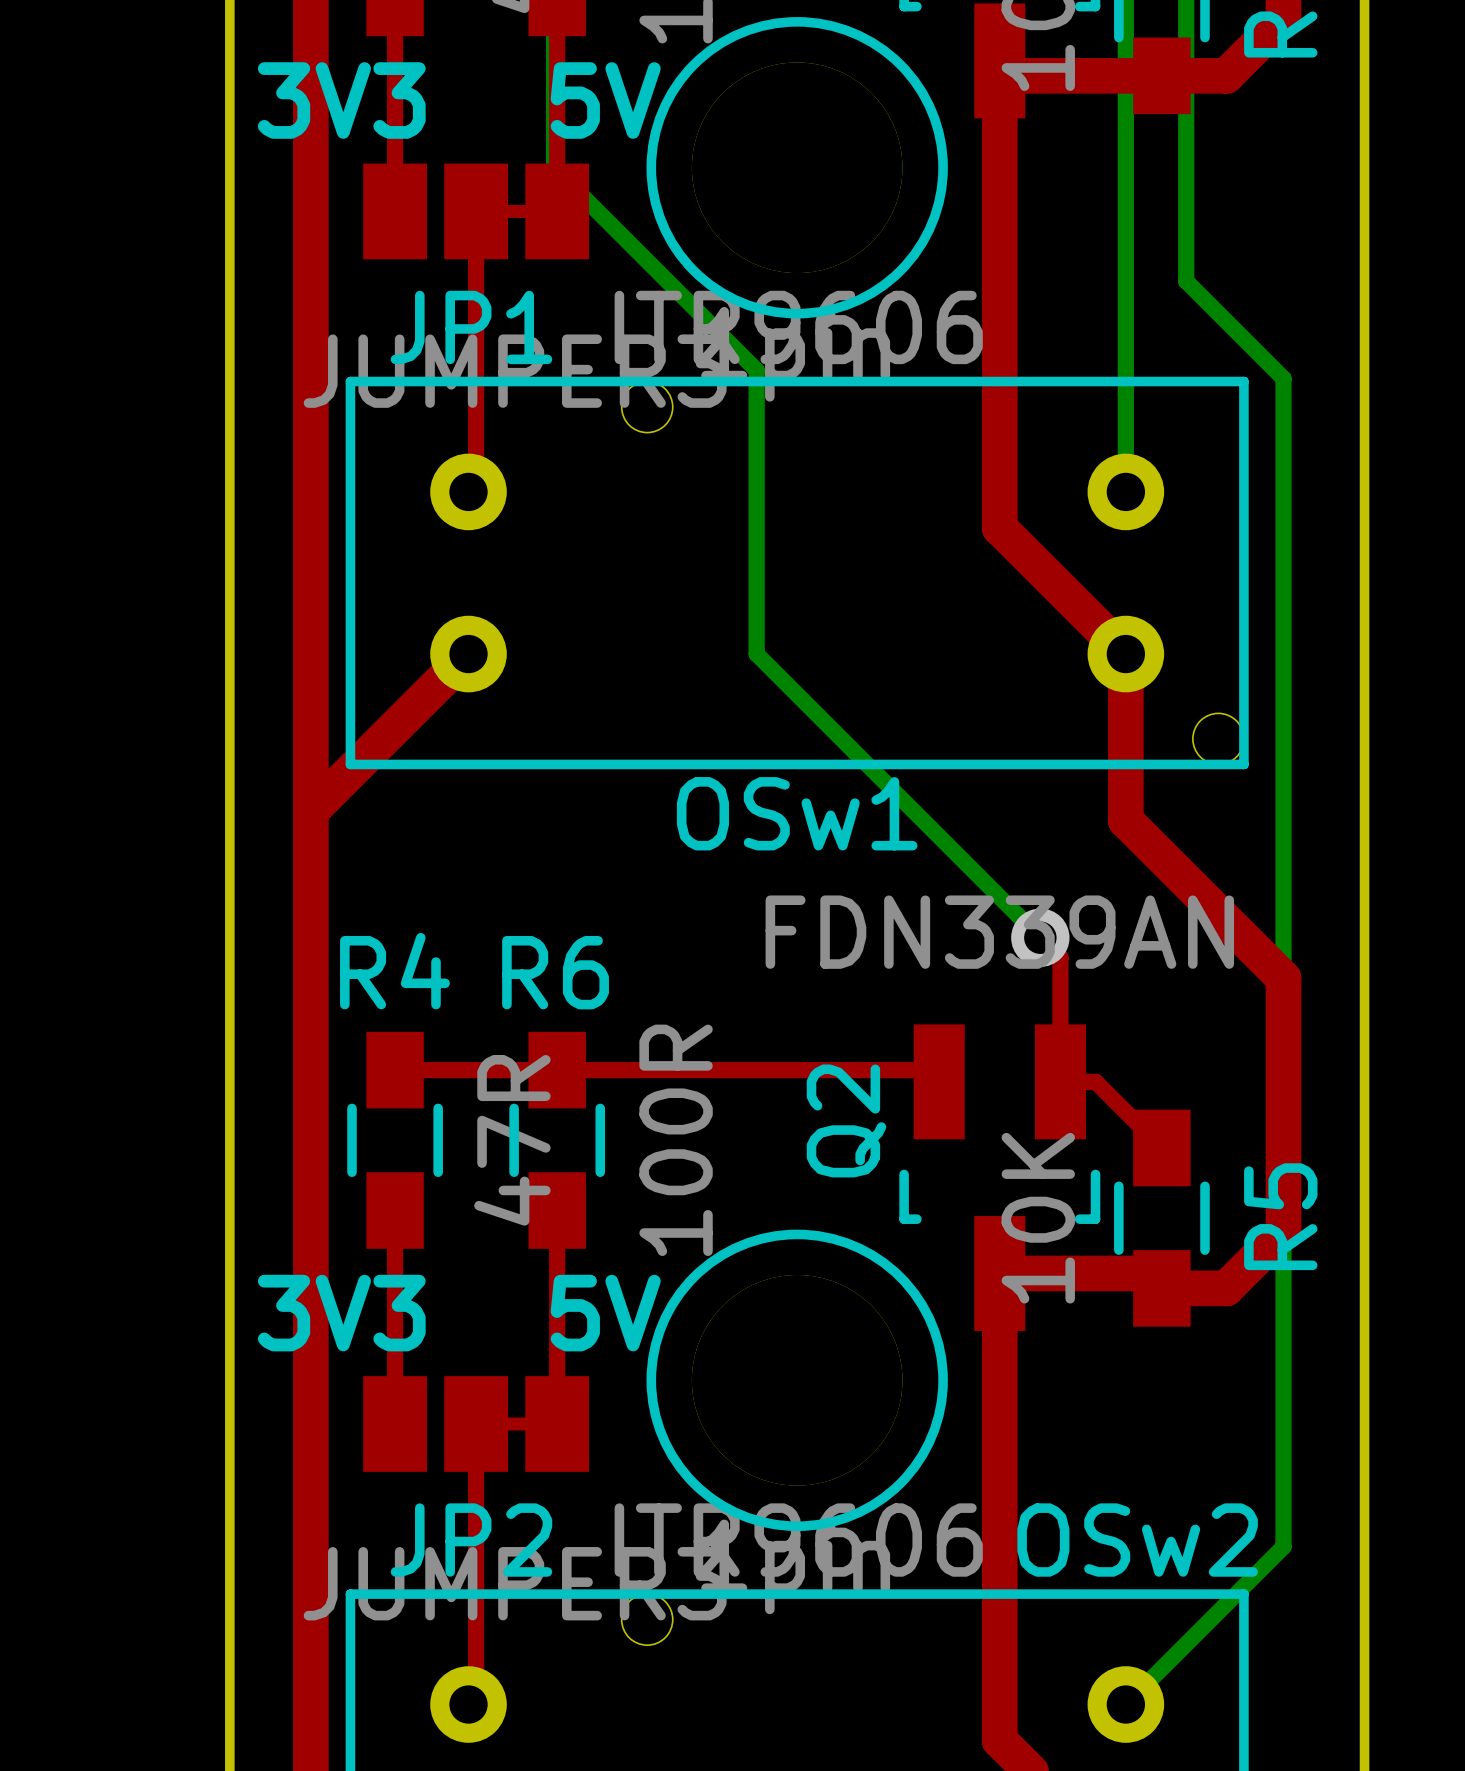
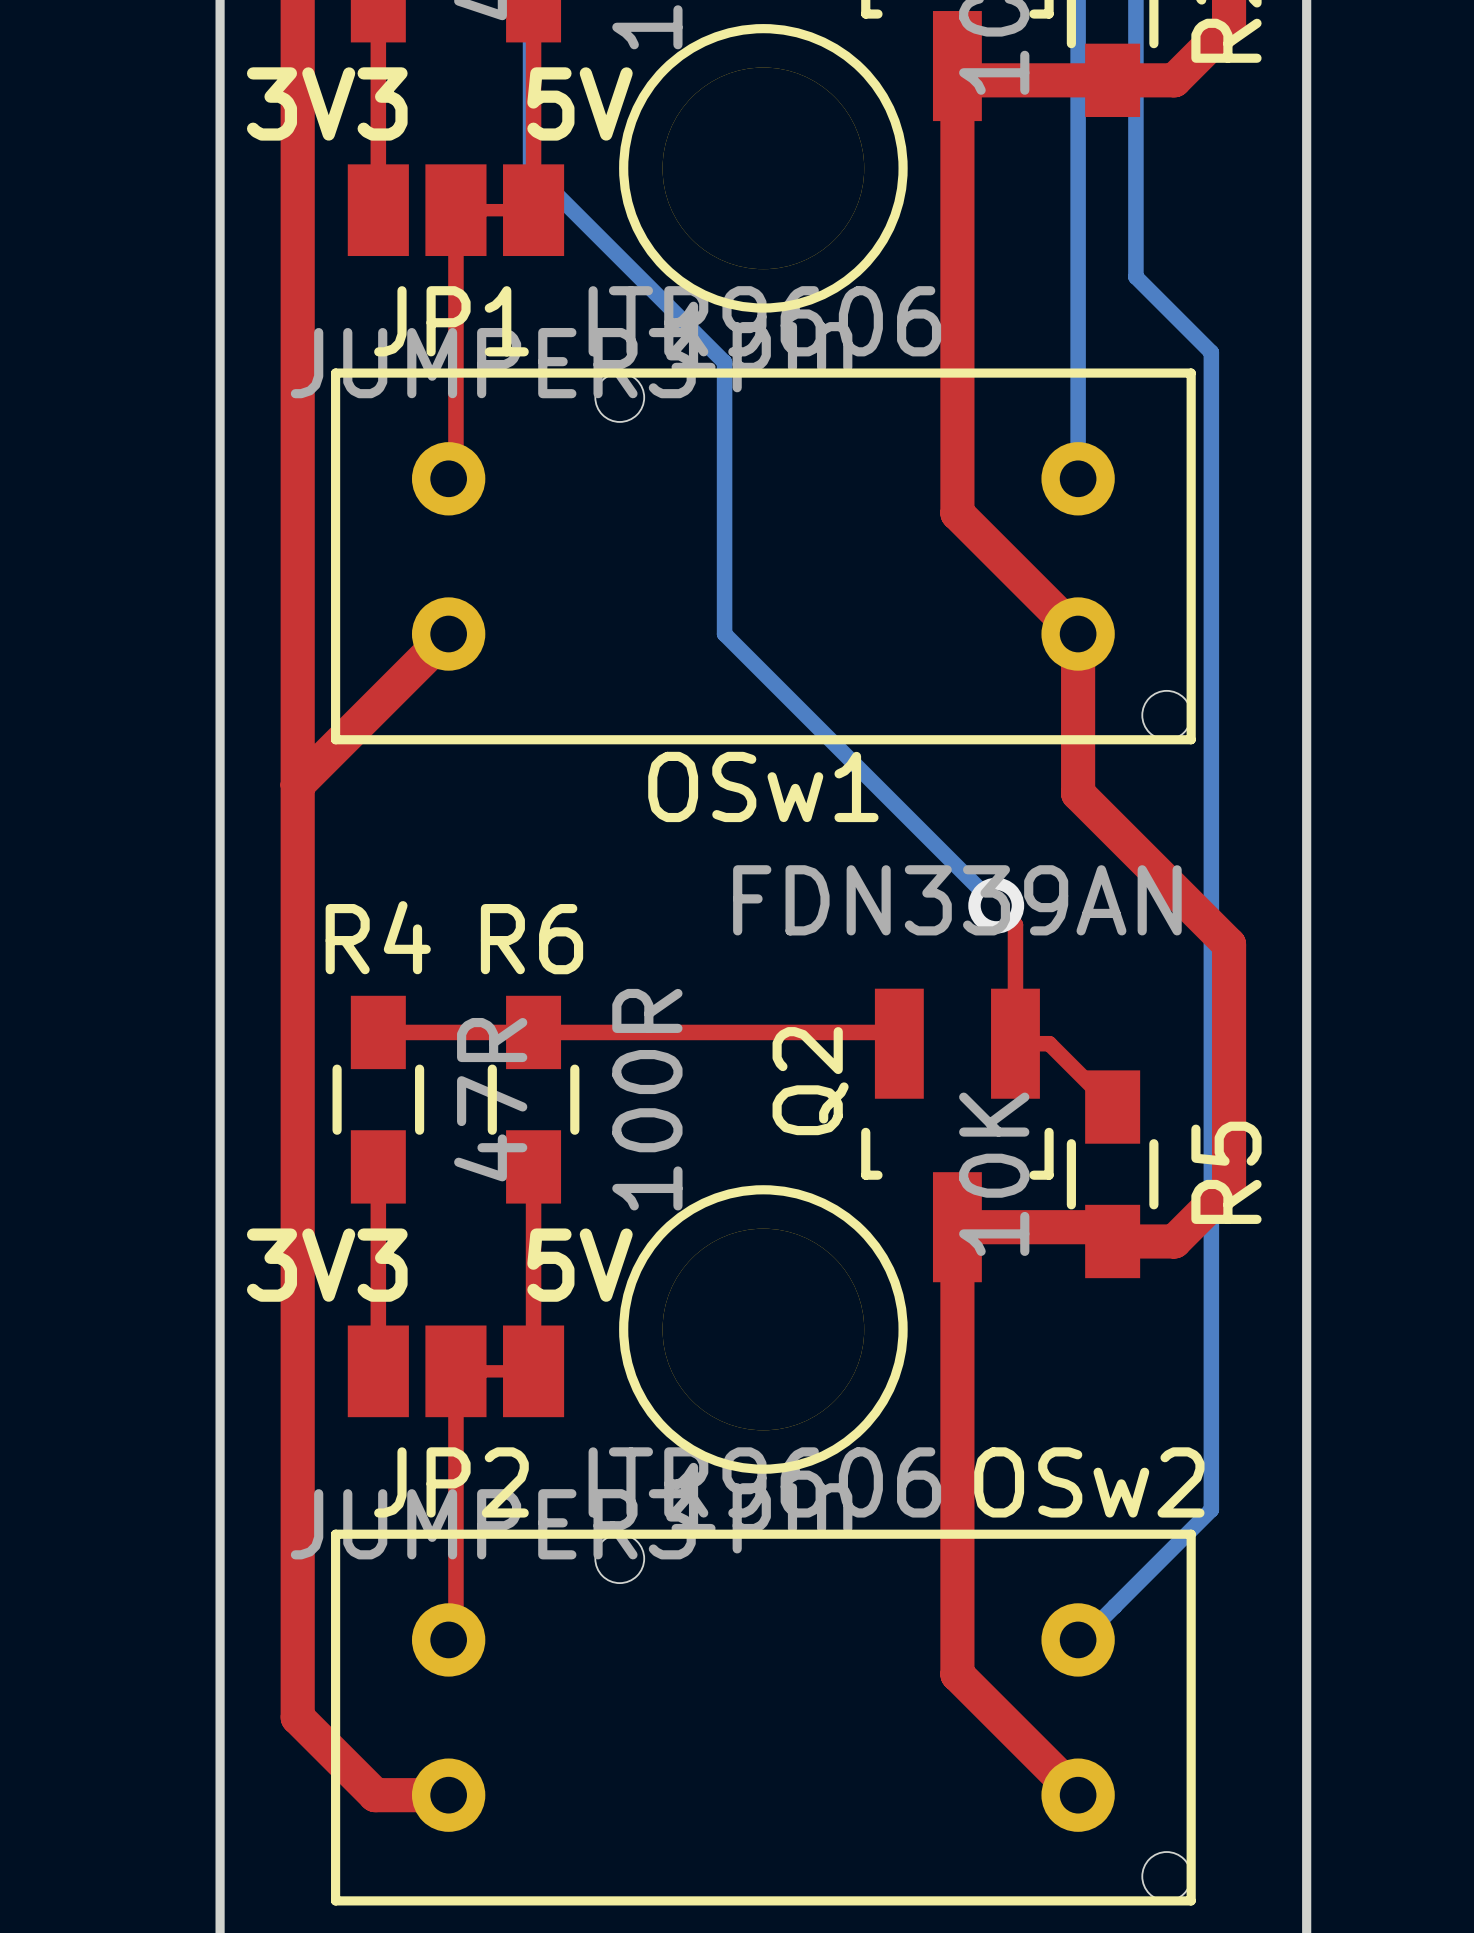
bottom track: (1265, 359) (1283, 378) (1283, 1546) (1125, 1704) -> (1211, 352) (1211, 1509) (1078, 1643)

